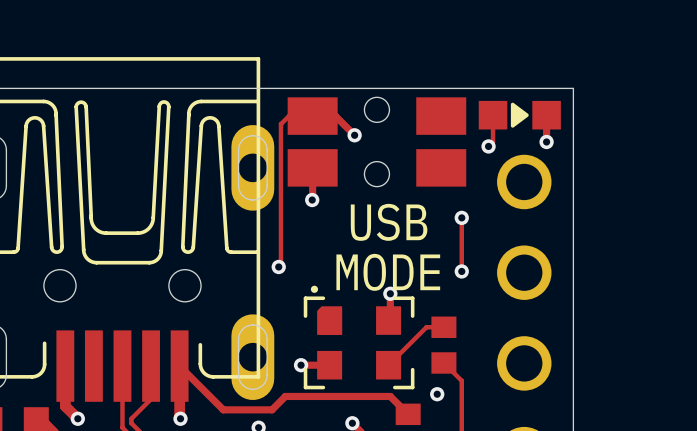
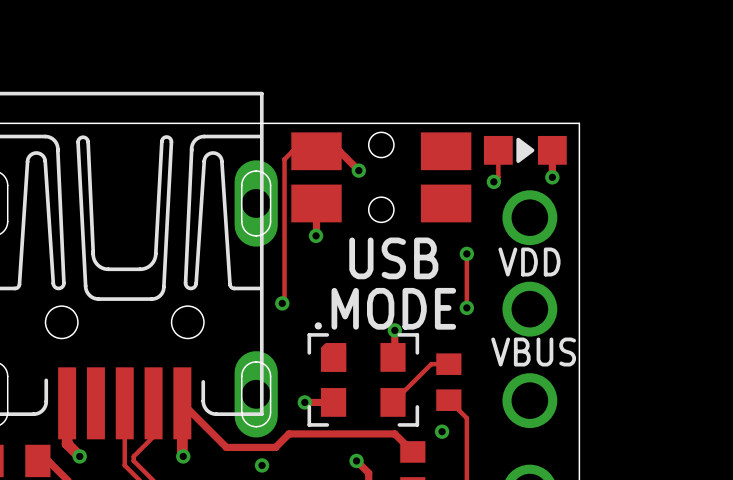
text: none -> VDD (529, 261)
text: none -> VBUS (533, 352)

